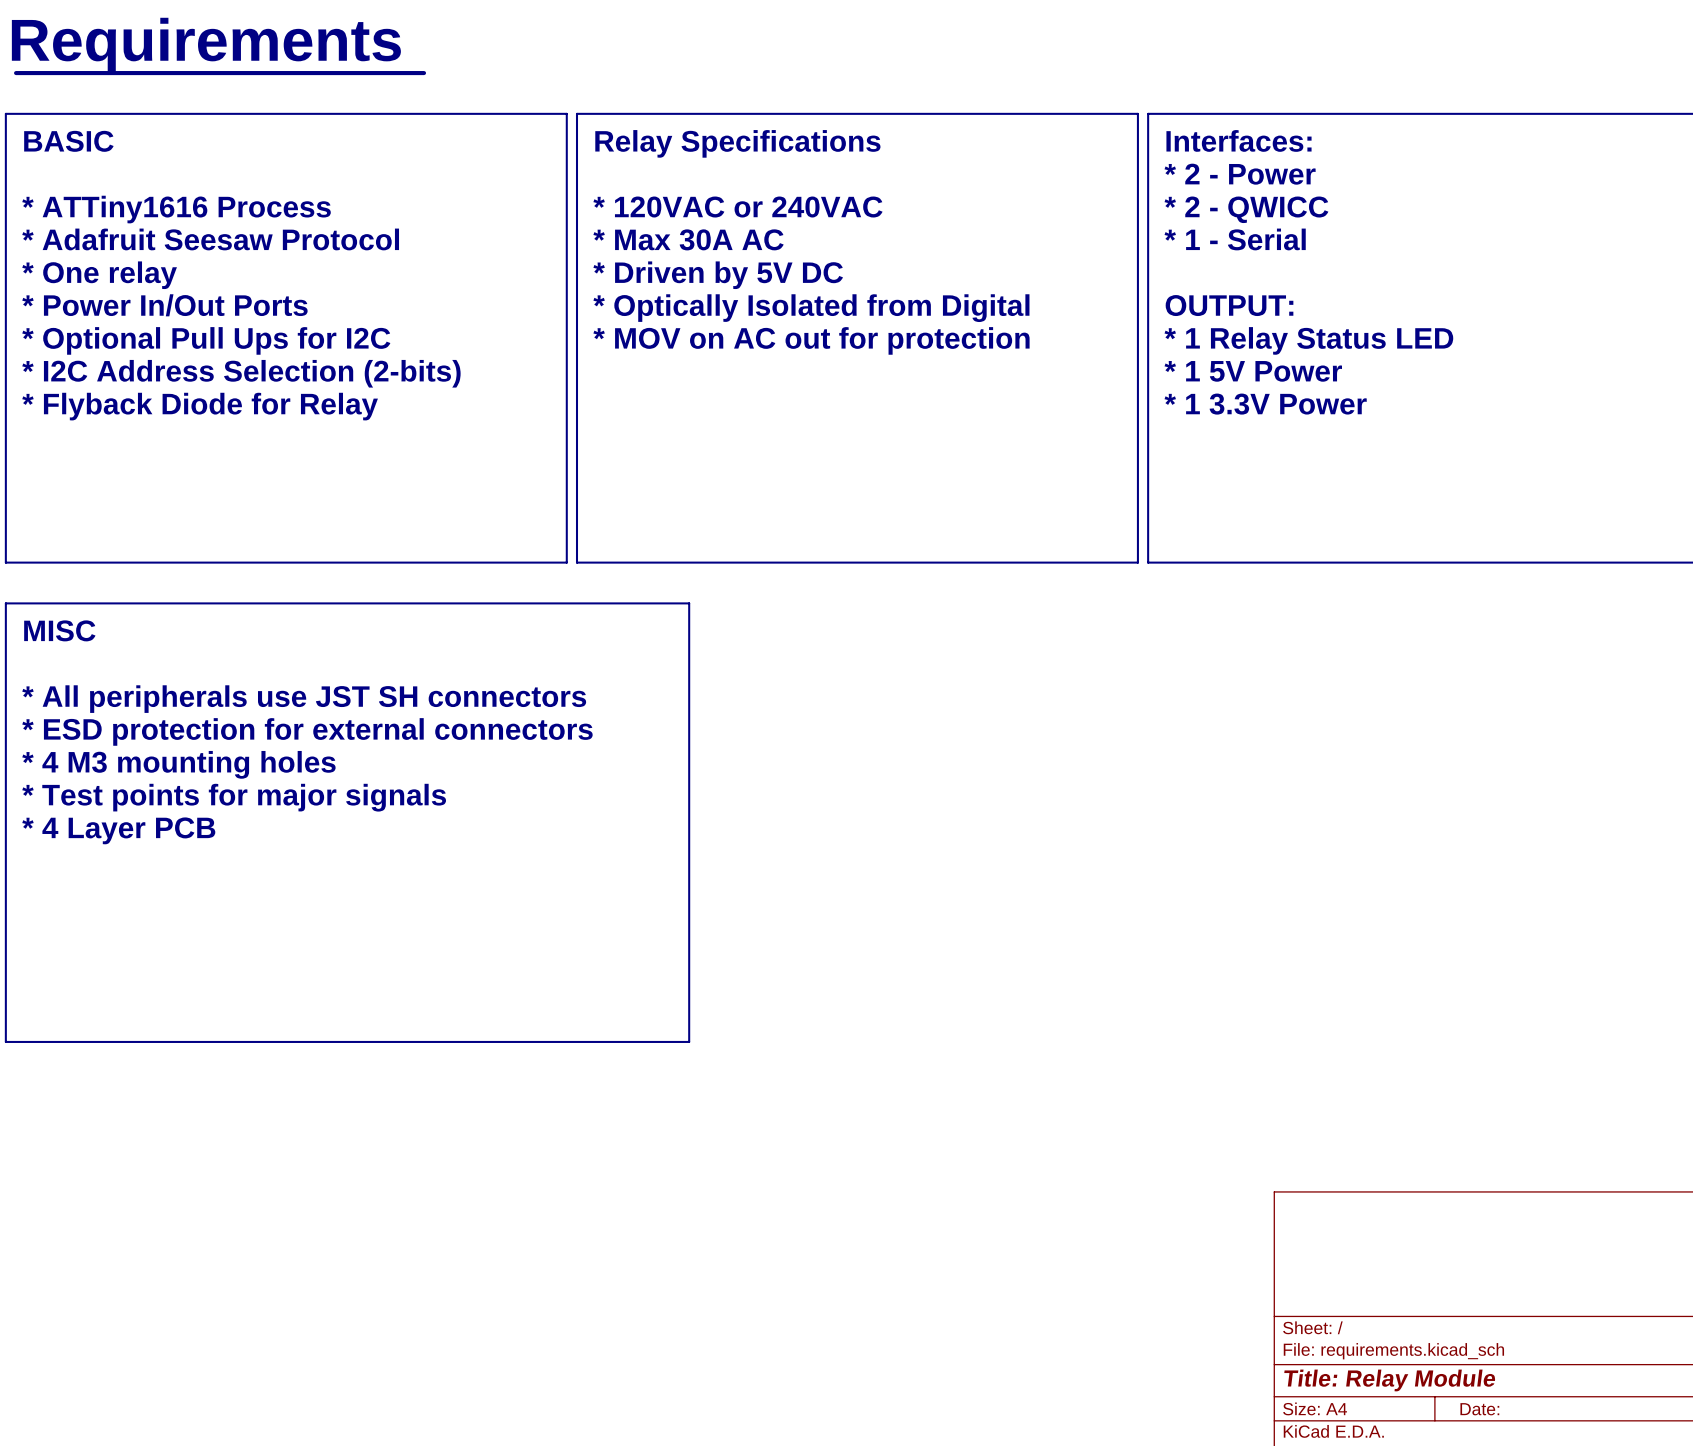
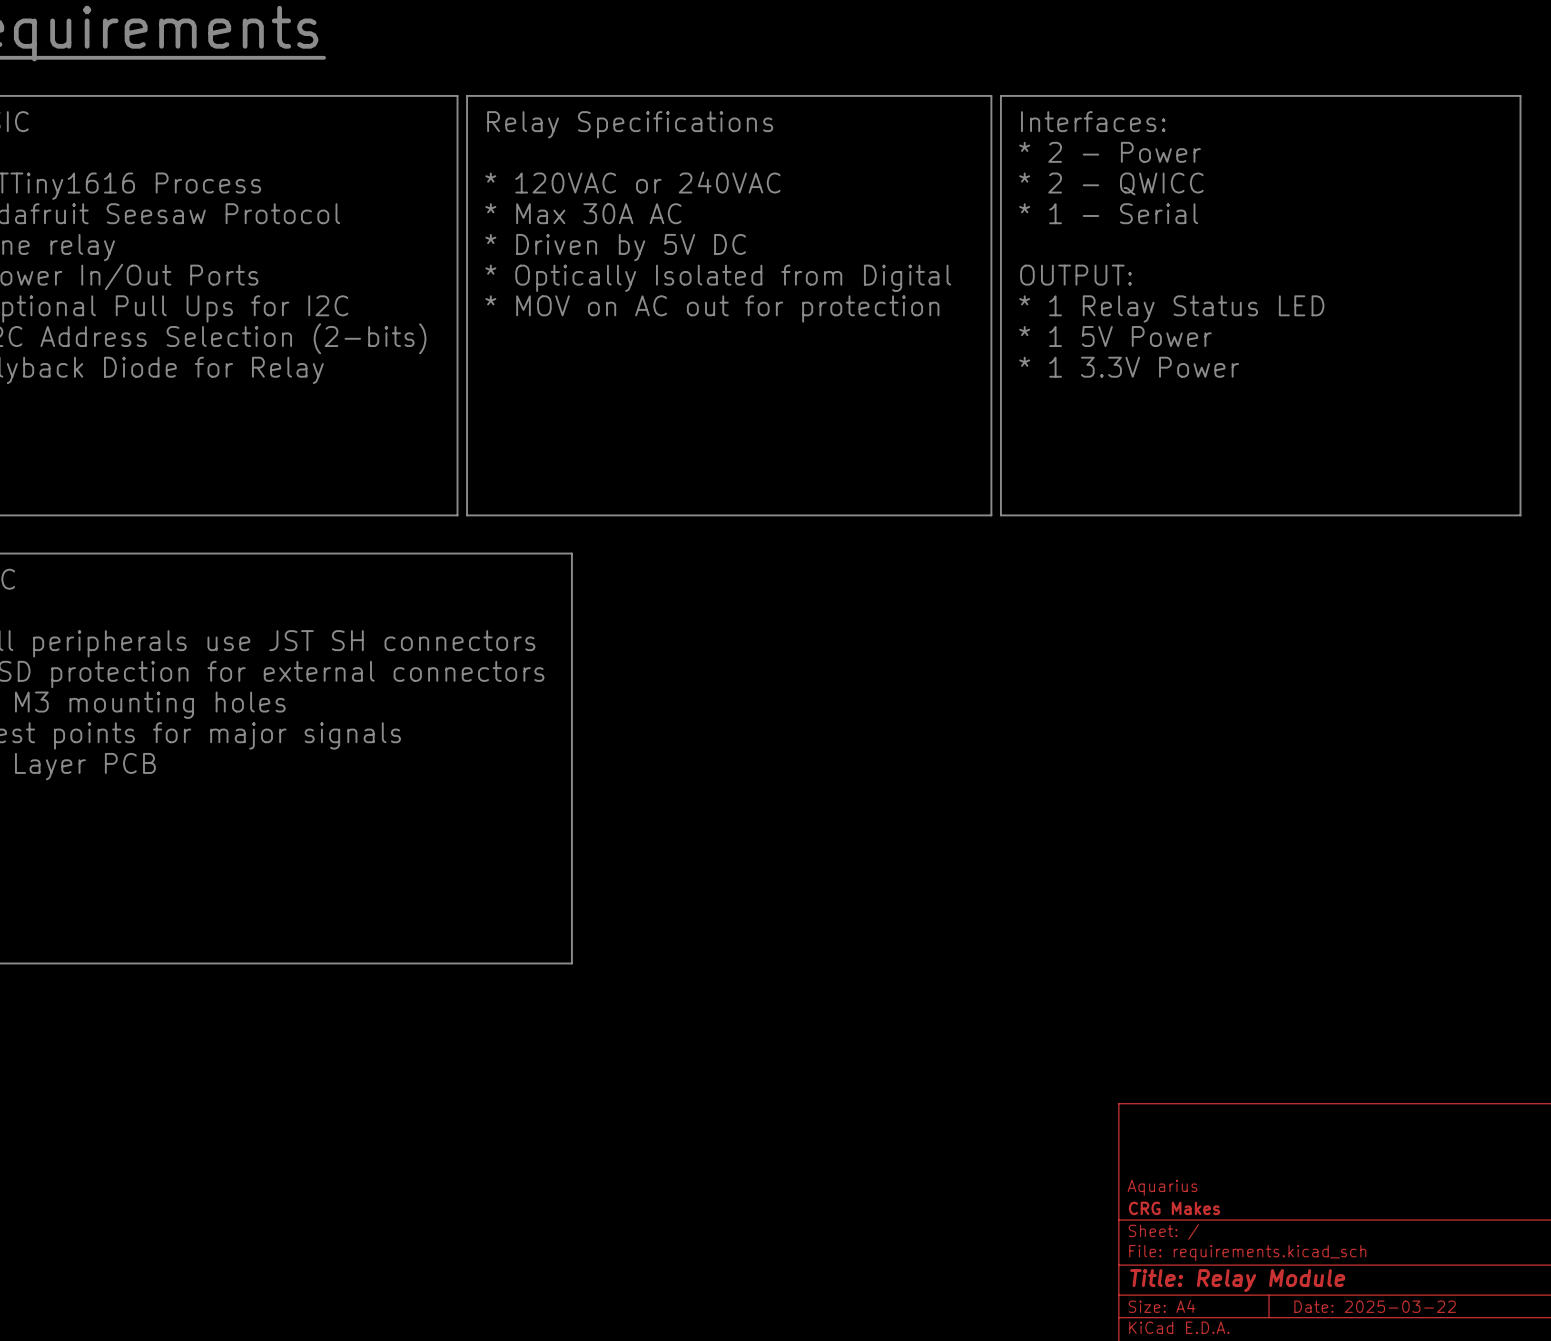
title block: none -> Aquarius (1162, 1187)
title block: none -> CRG Makes (1174, 1208)
title block: Date: (1479, 1409) -> Date: 2025-03-22 (1375, 1306)

